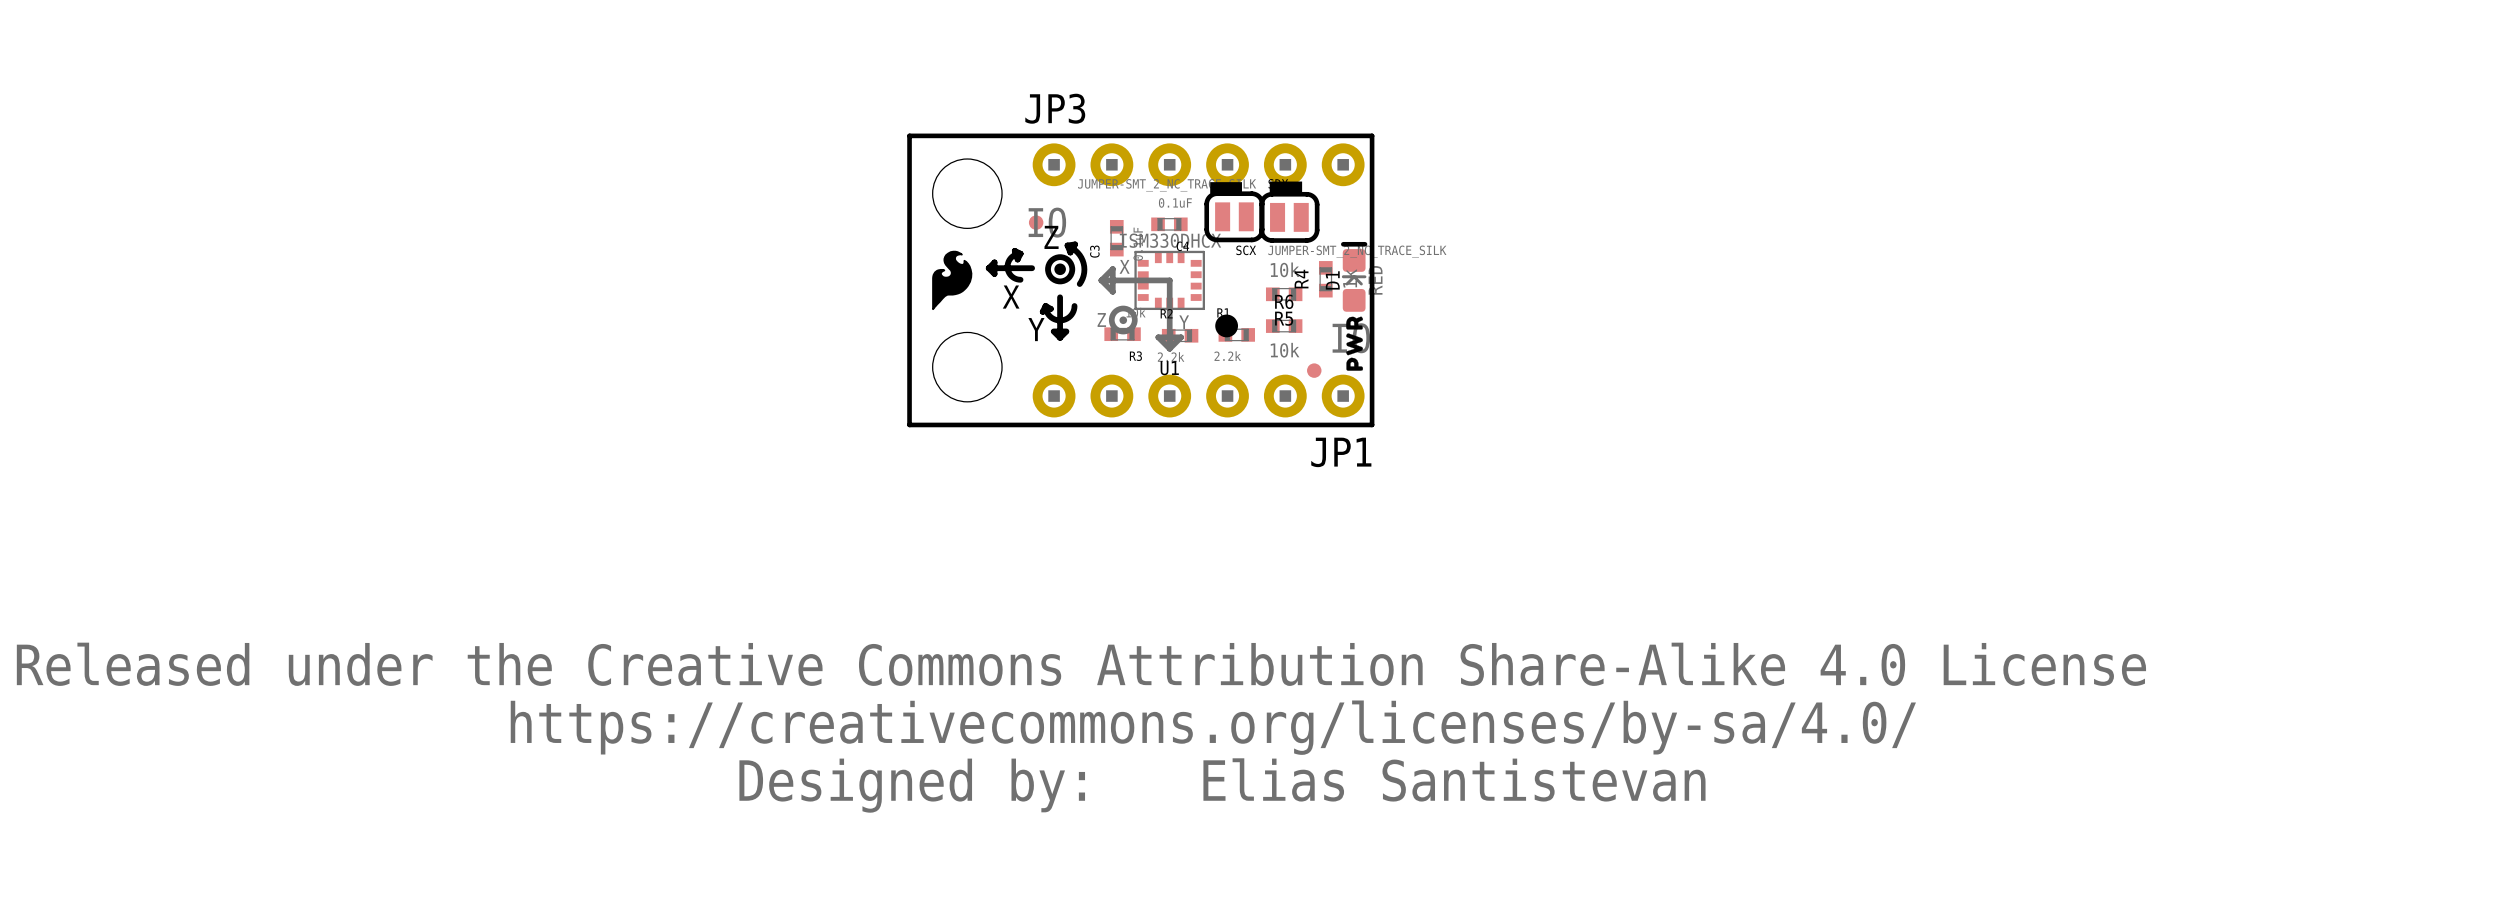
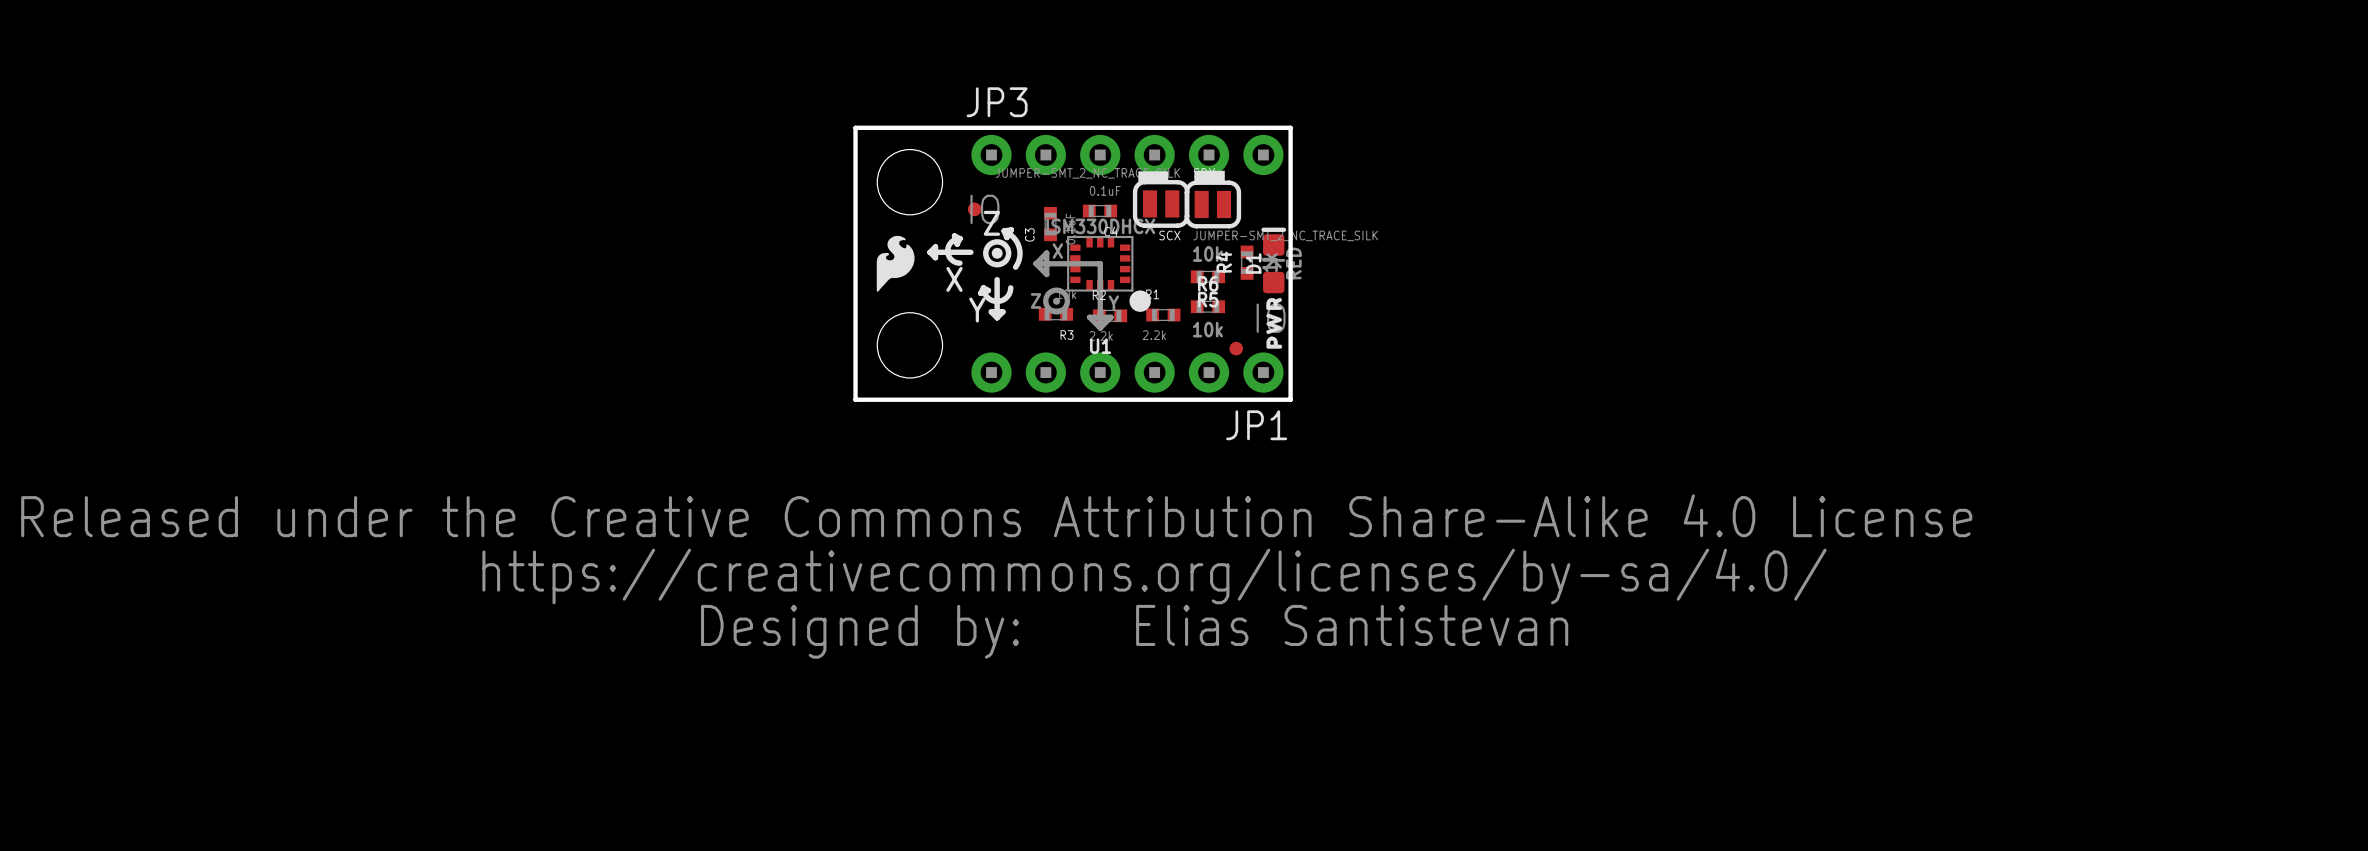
U1 footprint: [1098, 250, 1239, 352] -> [1033, 235, 1151, 331]
drawing position: (1081, 727) -> (996, 576)

